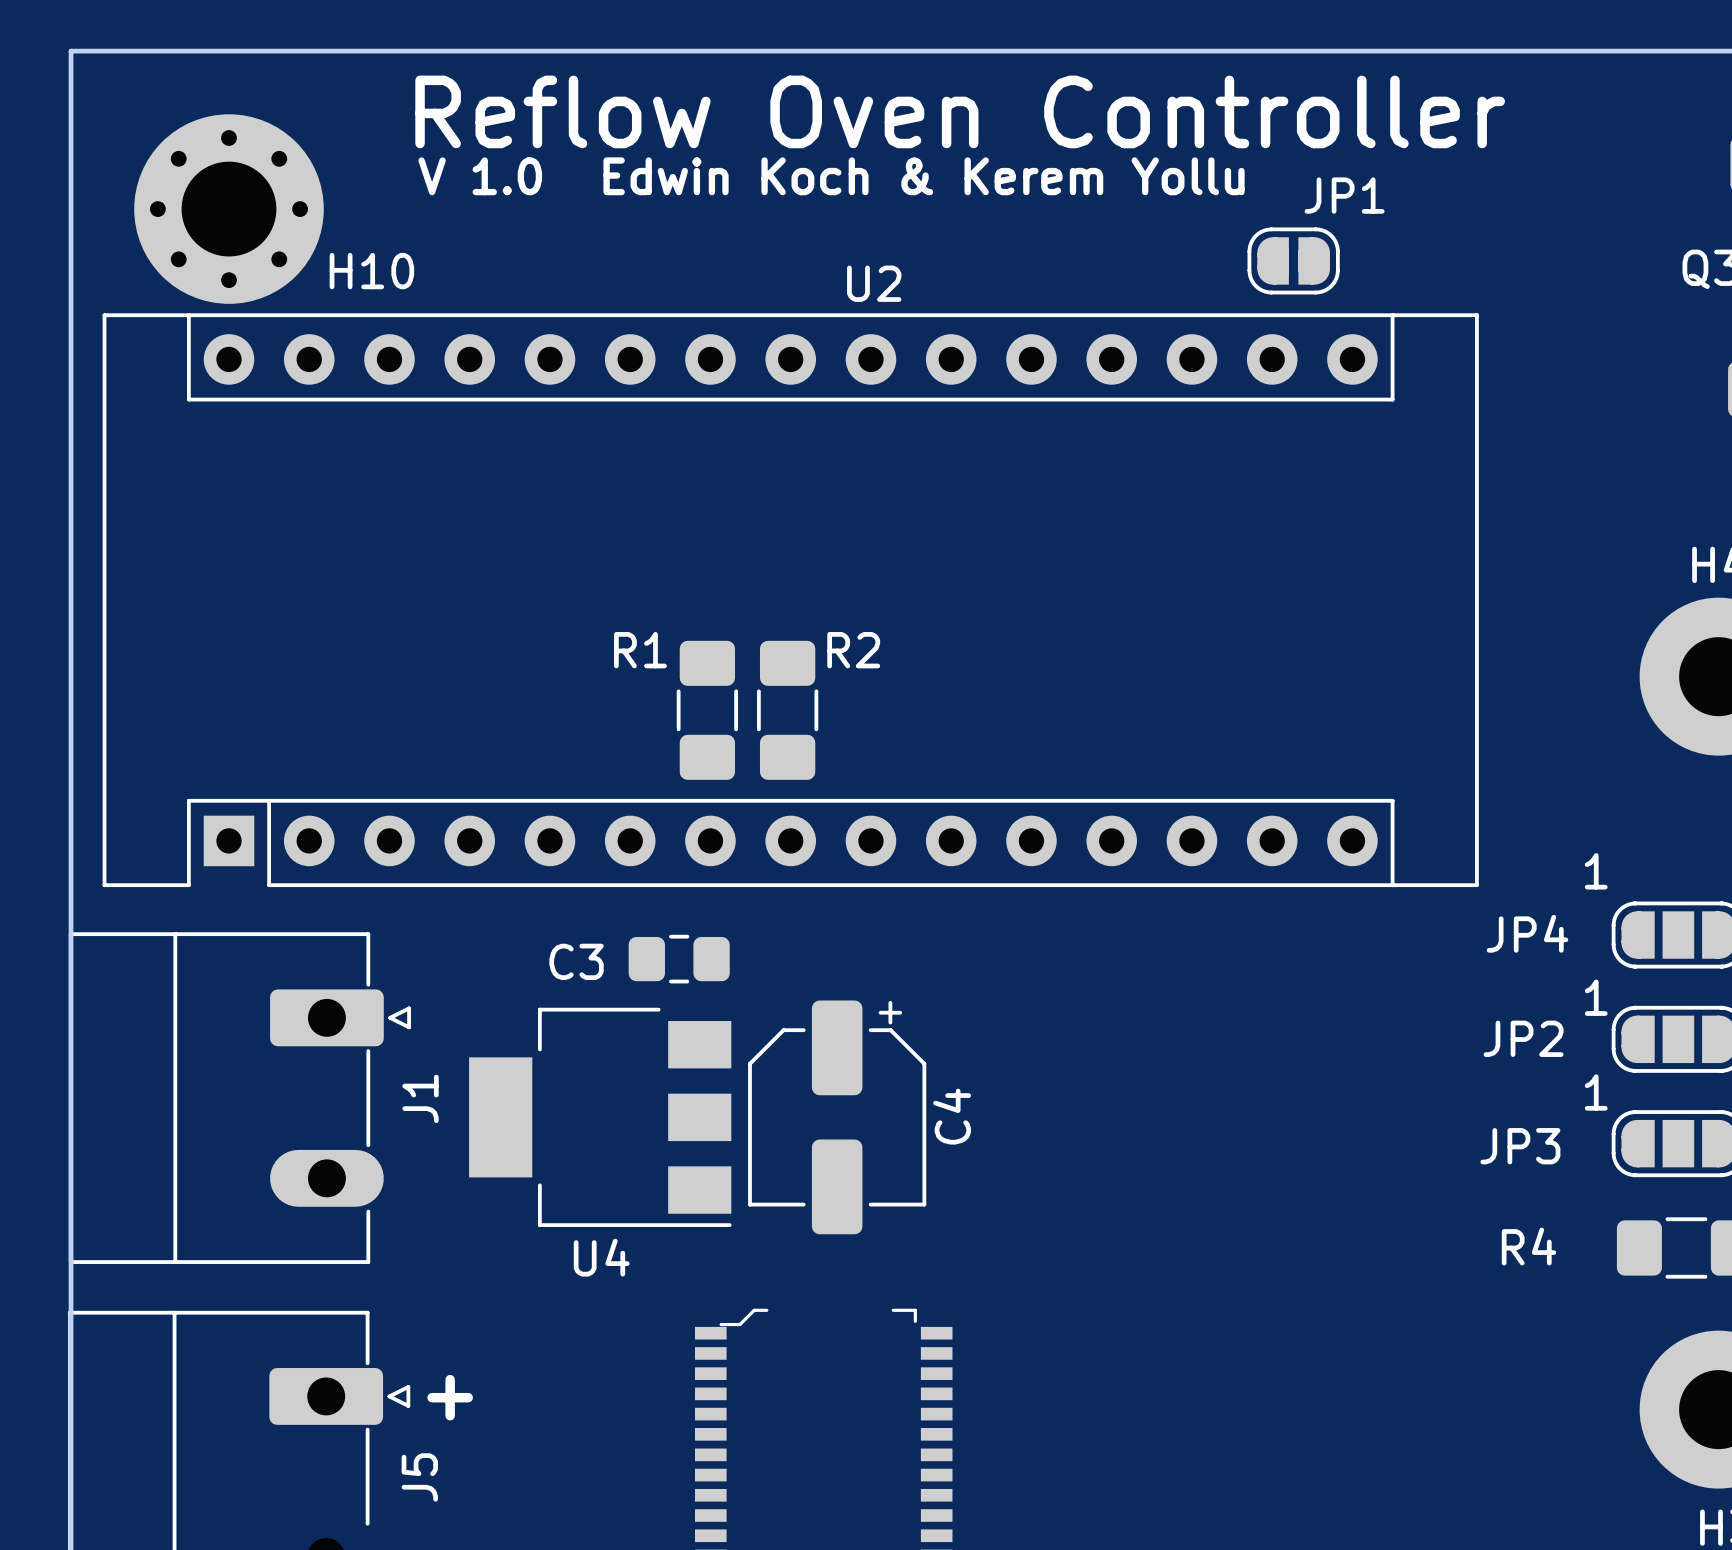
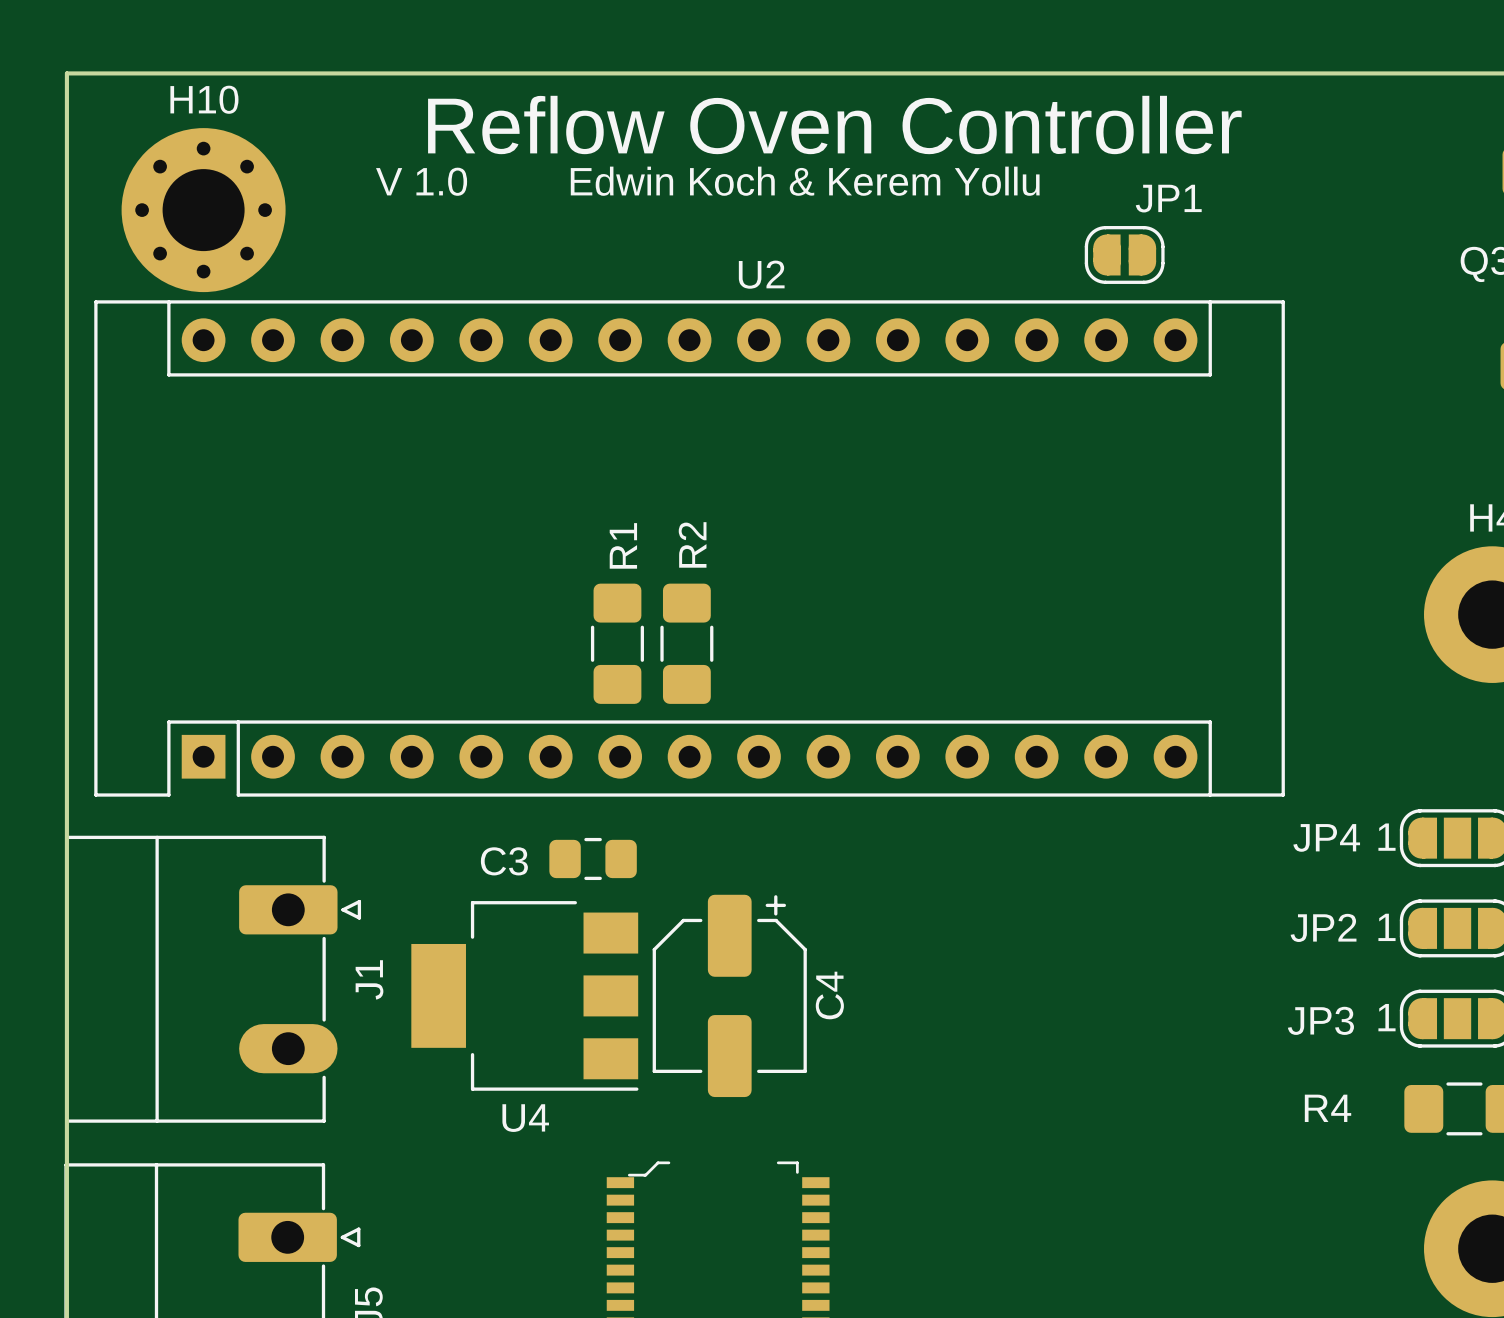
H10 name position: H10 (371, 271) -> H10 (204, 99)
R1 name rotation: 0° (640, 650) -> 90° counterclockwise (623, 545)
R1 name position: R1 (640, 650) -> R1 (623, 545)
R2 name rotation: 0° (853, 650) -> 90° counterclockwise (692, 544)
R2 name position: R2 (853, 650) -> R2 (692, 544)
JP4 text position: 1 (1596, 871) -> 1 (1386, 837)
JP2 text position: 1 (1596, 997) -> 1 (1386, 927)
JP3 text position: 1 (1596, 1092) -> 1 (1386, 1017)
text: + (450, 1397) -> none

